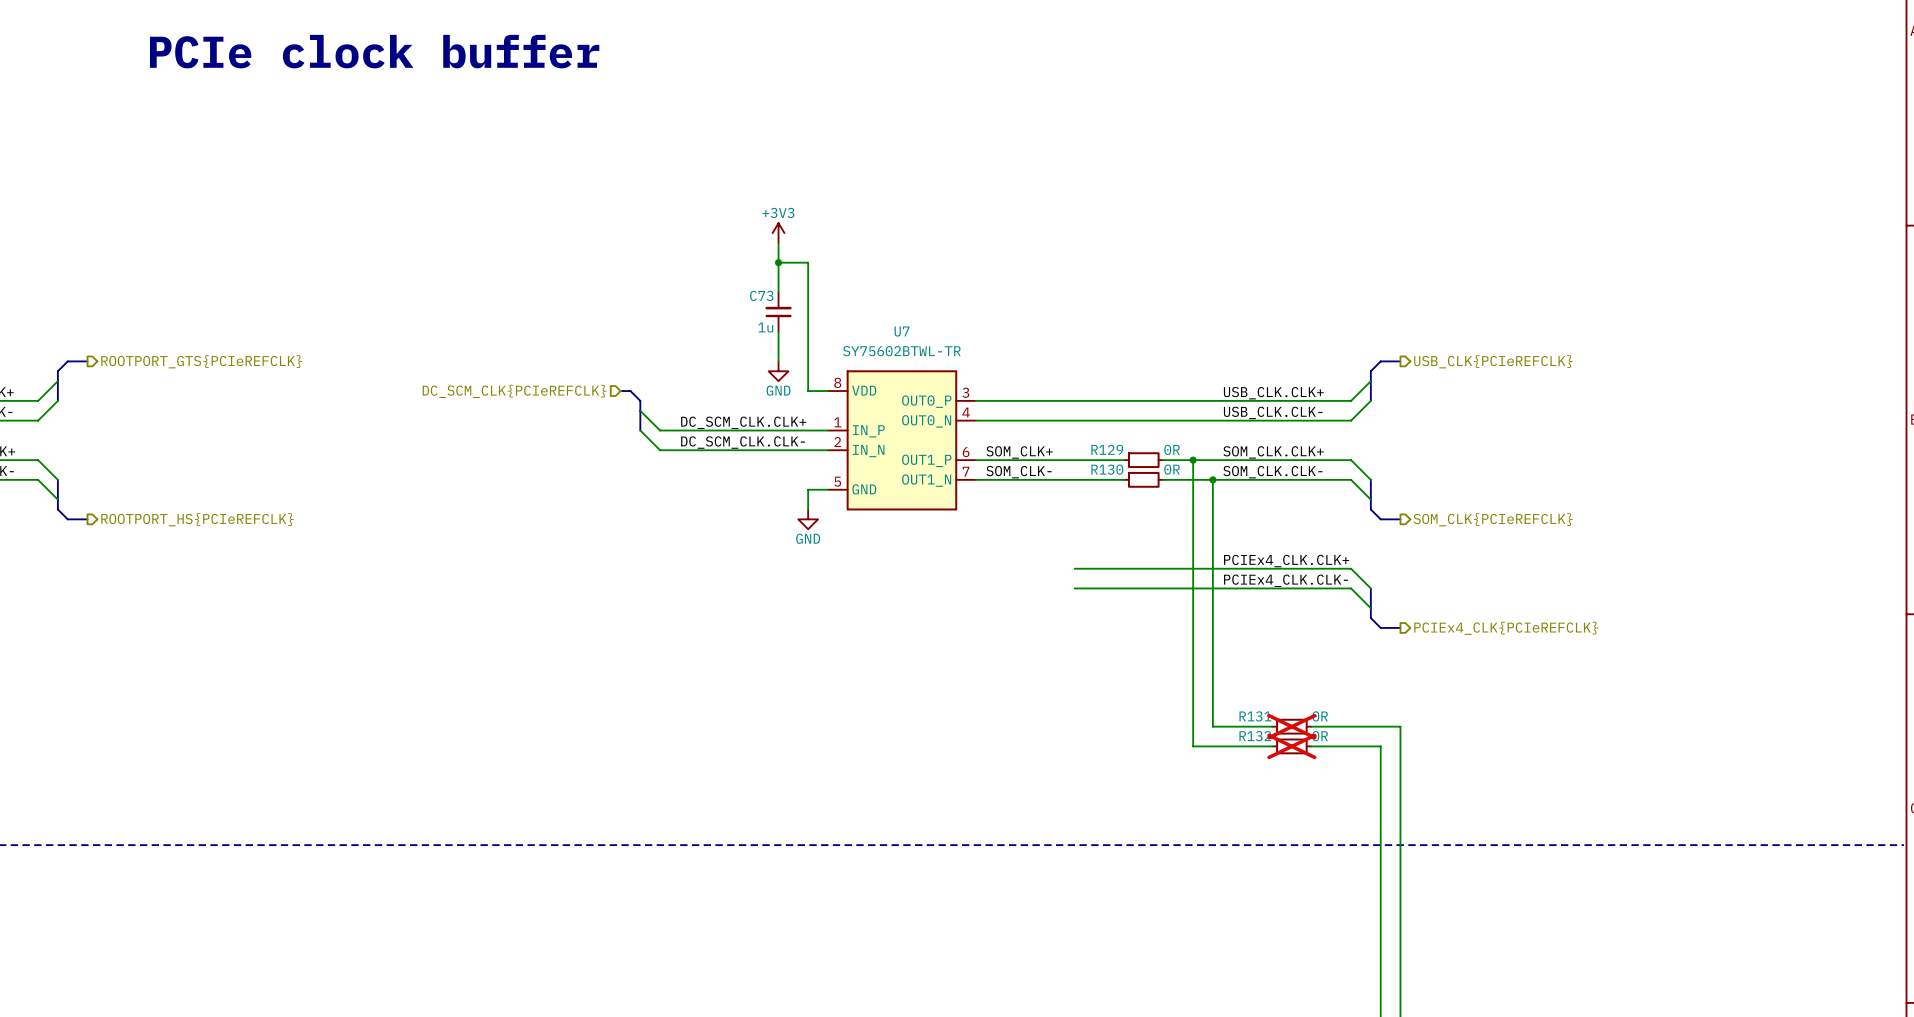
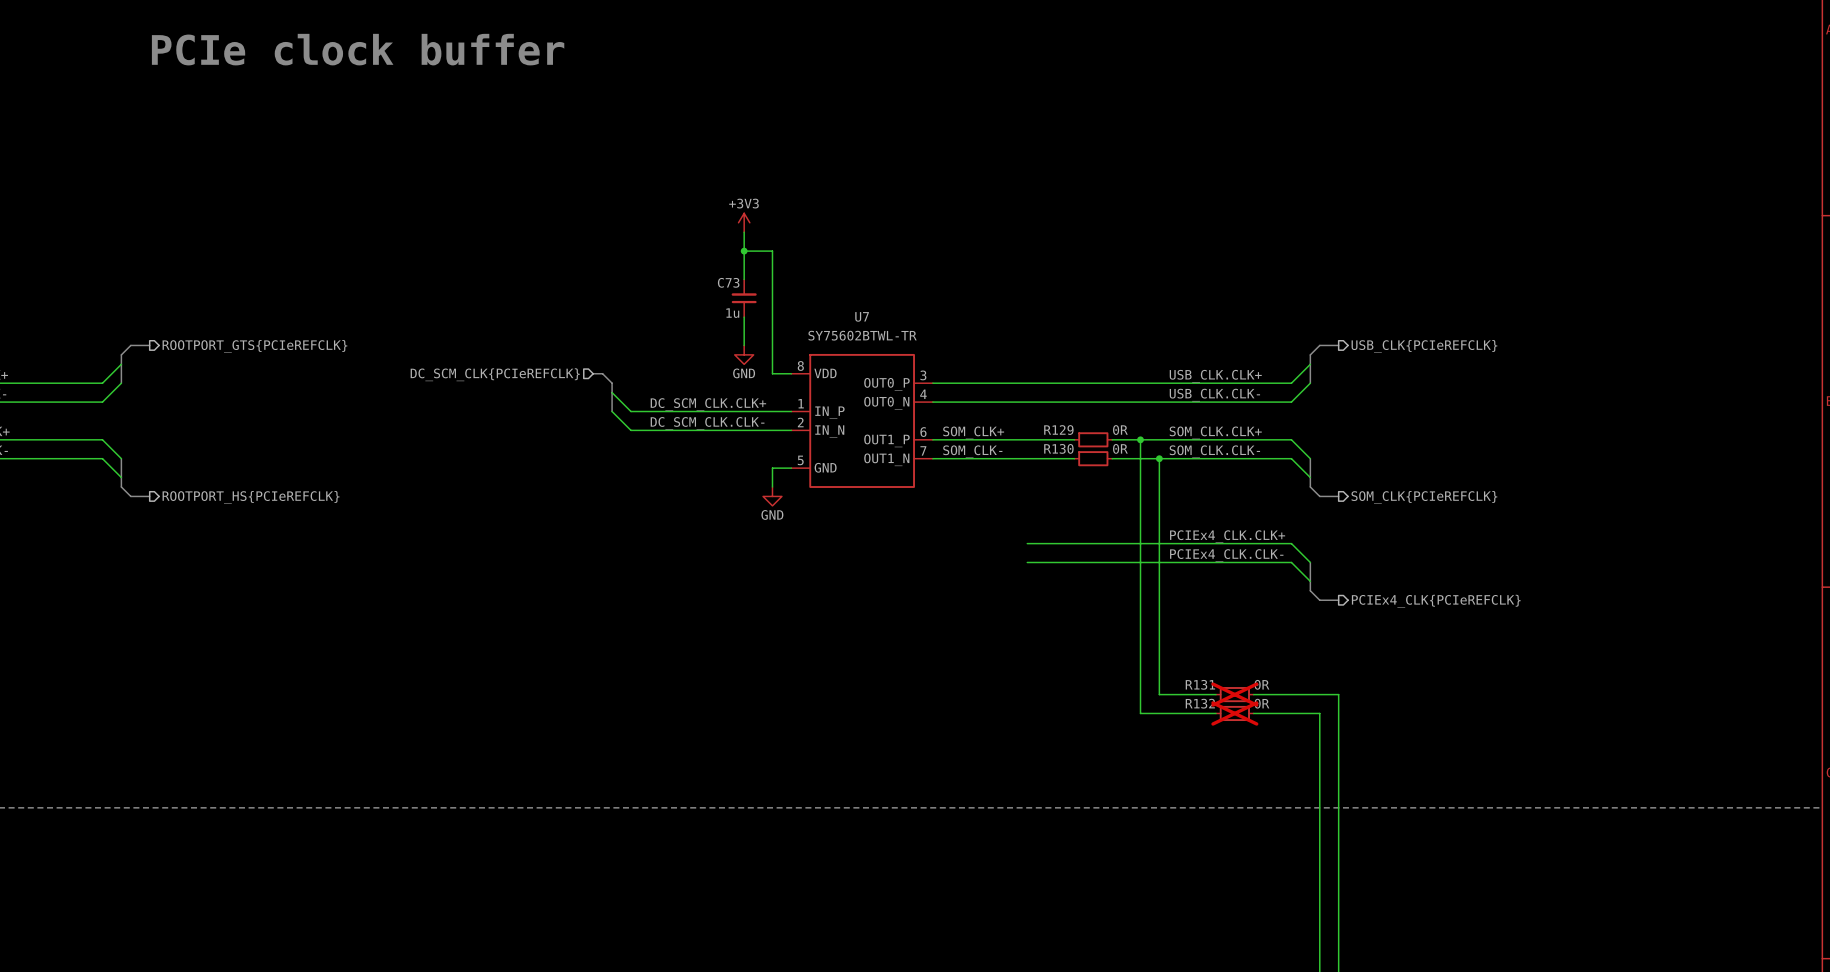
bus: (87, 361) (67, 361) (57, 371) (57, 400) -> (149, 345) (130, 345) (121, 354) (121, 383)
hierarchical label position: ROOTPORT_GTS{PCIeREFCLK} (201, 361) -> ROOTPORT_GTS{PCIeREFCLK} (254, 346)
wire: (57, 381) (38, 400) -> (121, 364) (102, 383) (36, 383)
wire: (57, 400) (38, 420) -> (121, 383) (102, 402) (36, 402)
wire: (38, 460) (57, 479) -> (36, 439) (102, 439) (121, 458)
wire: (38, 479) (57, 499) -> (36, 458) (102, 458) (121, 477)
bus: (57, 479) (57, 509) (67, 519) (87, 519) -> (121, 458) (121, 487) (130, 496) (149, 496)
hierarchical label position: ROOTPORT_HS{PCIeREFCLK} (197, 519) -> ROOTPORT_HS{PCIeREFCLK} (251, 497)

